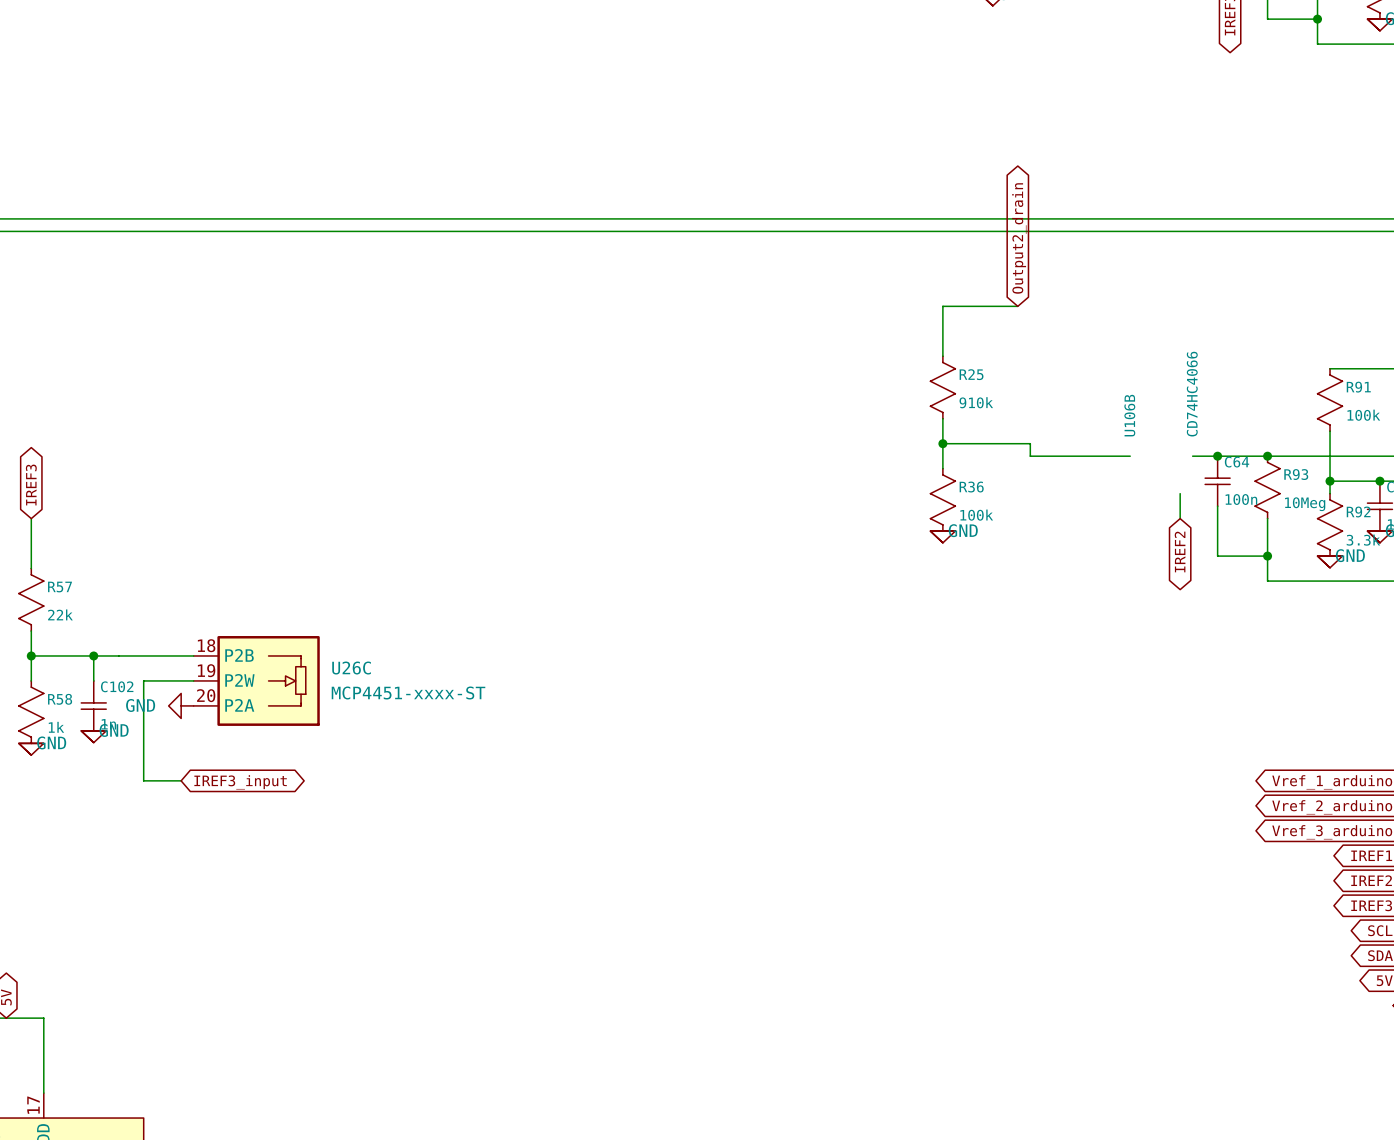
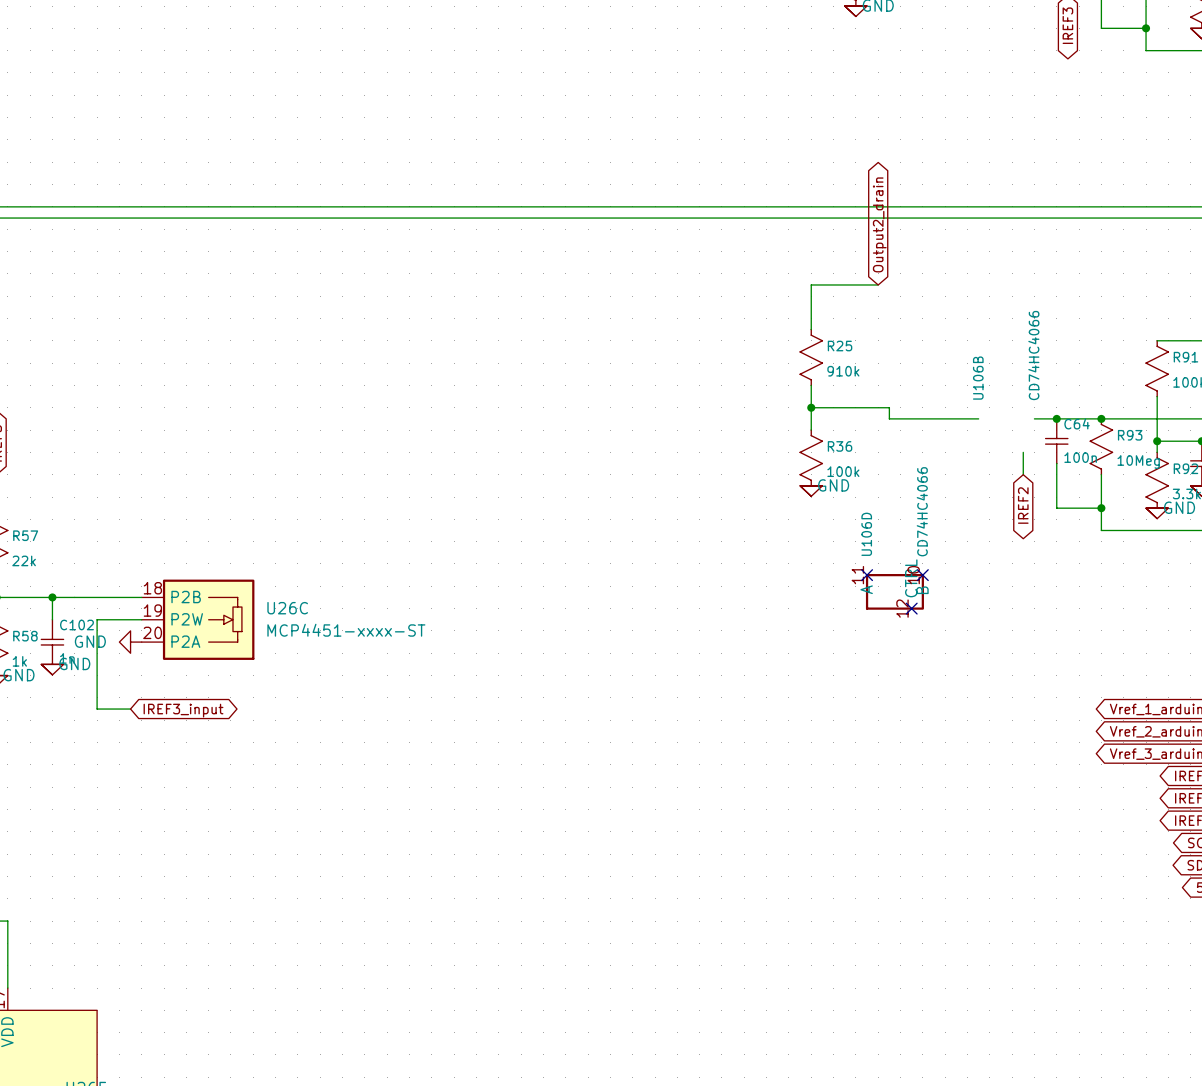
no-connect mark: none -> (867, 575)
no-connect mark: none -> (922, 575)
U106D: none -> CD74HC4066 (894, 591)
no-connect mark: none -> (911, 608)

